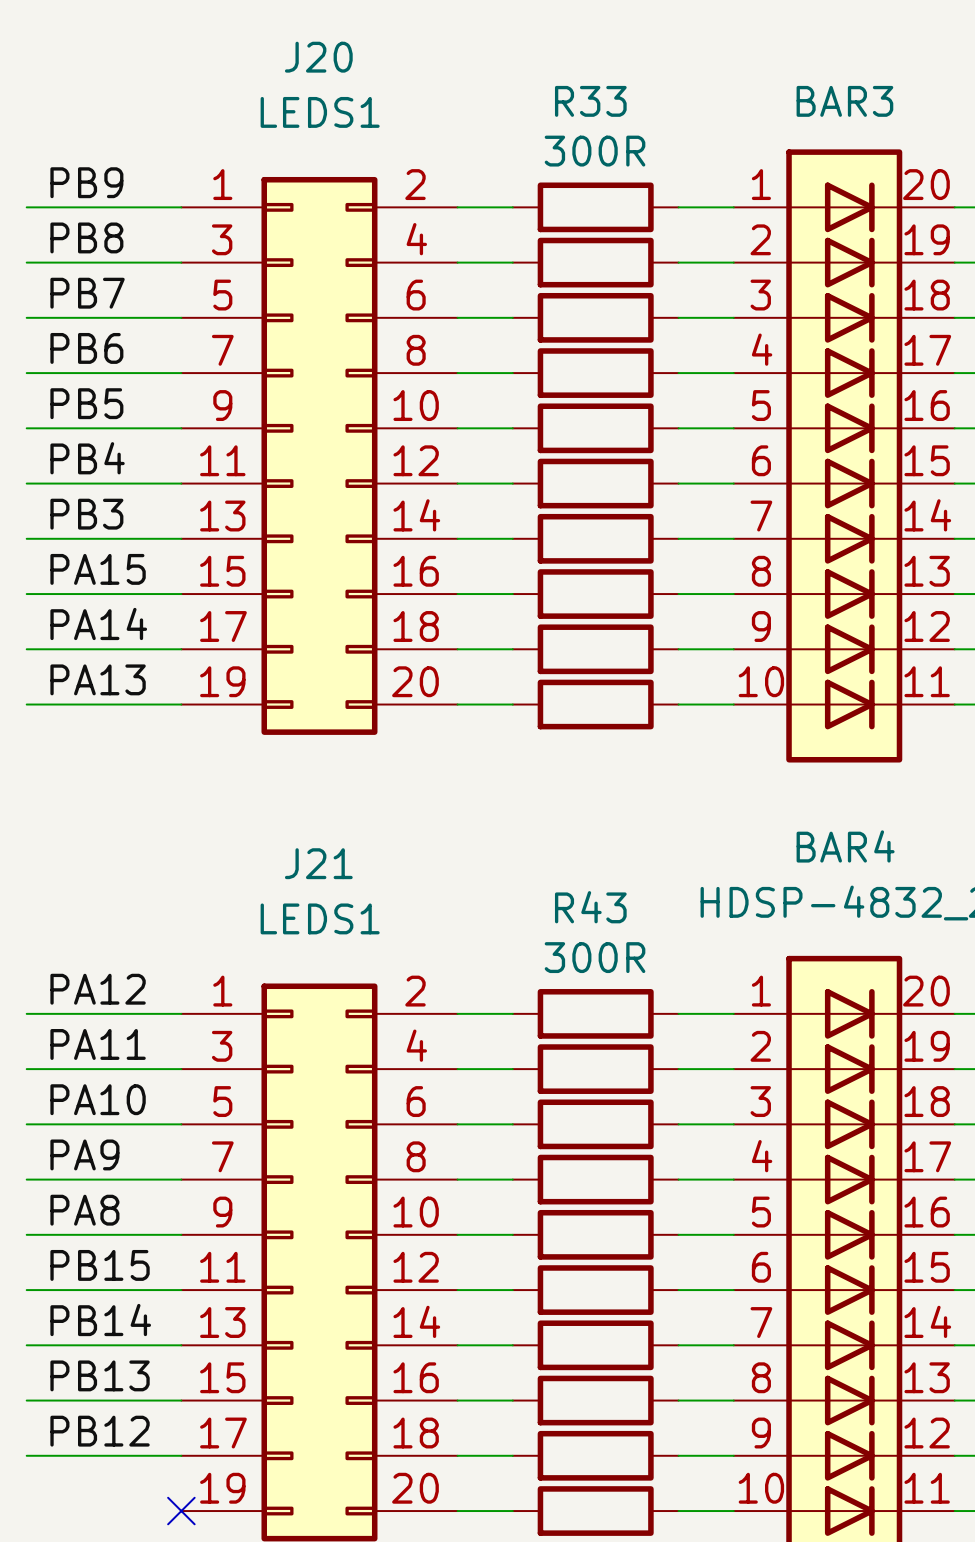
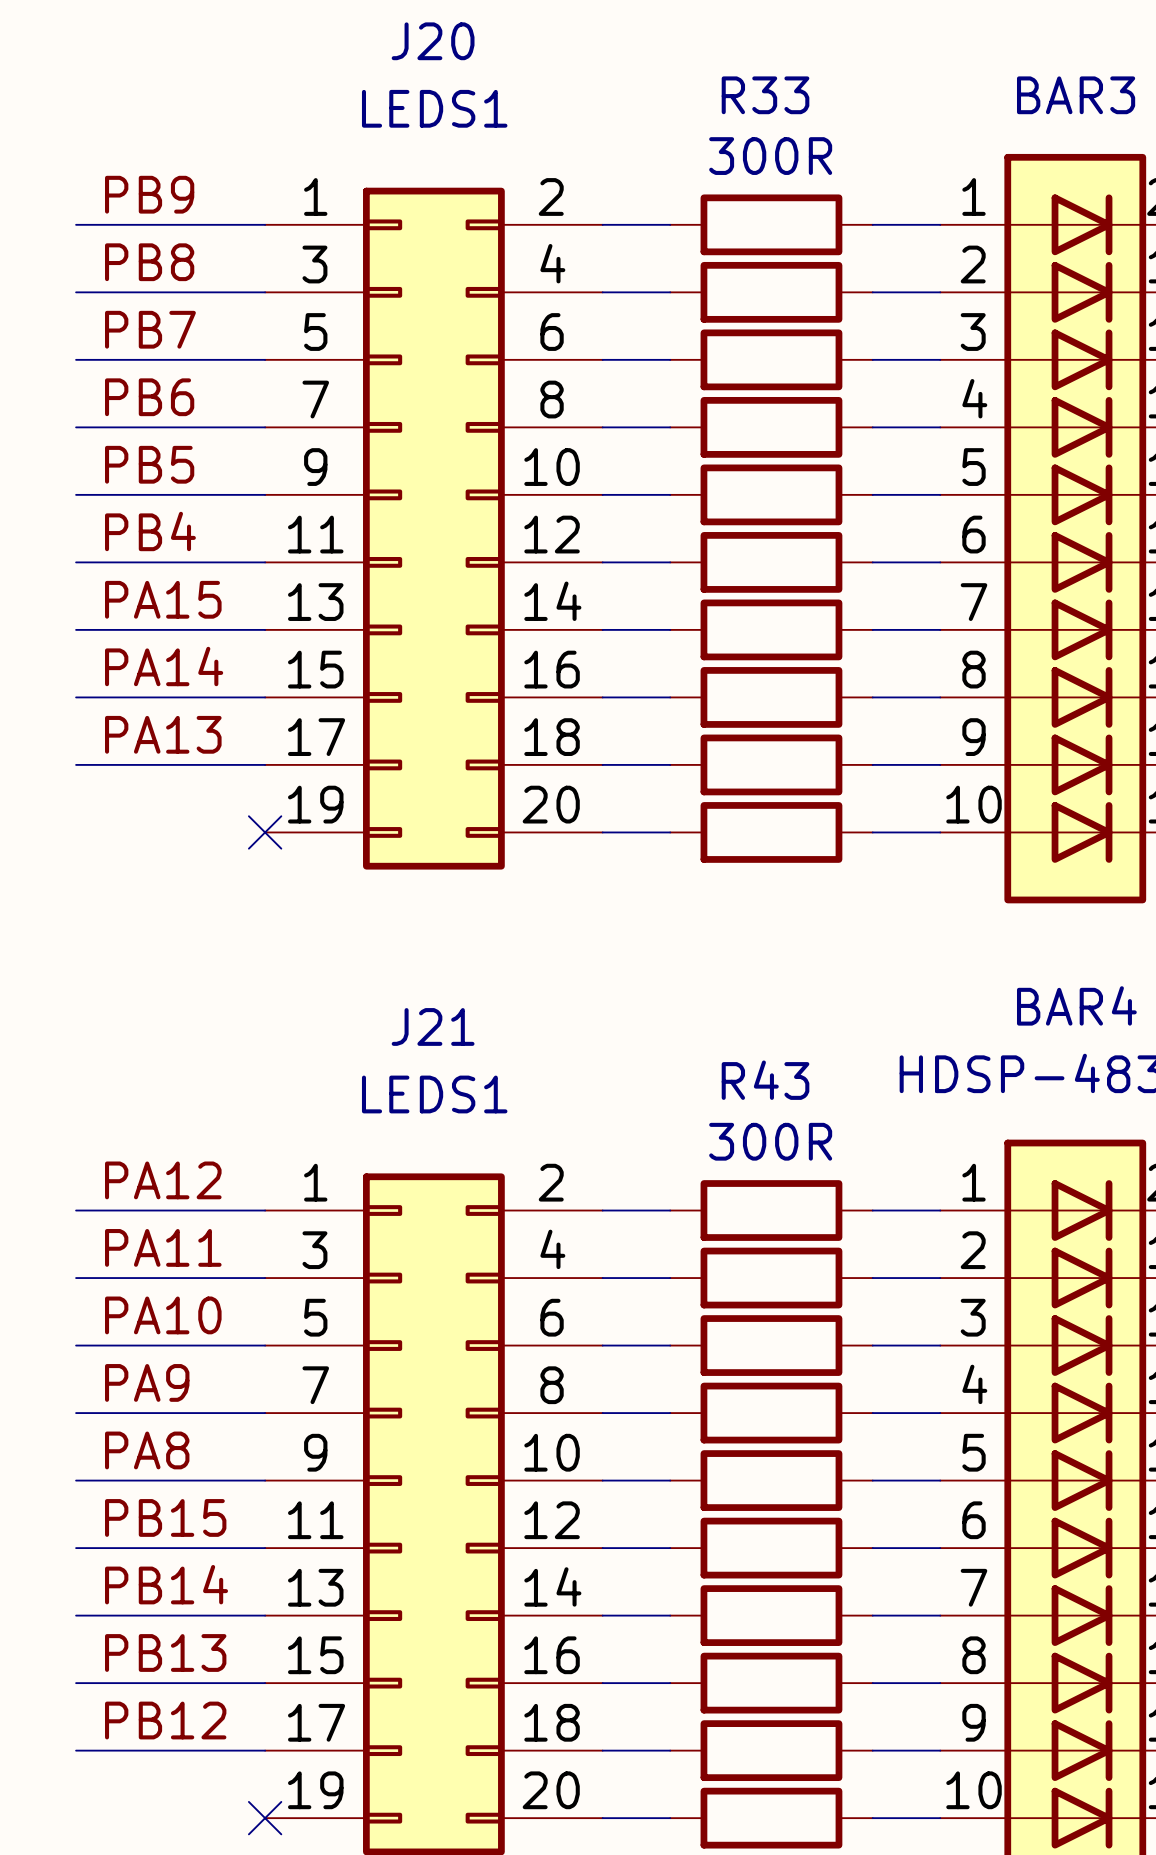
label: PB3 (86, 514) -> PA15 (163, 599)
label: PA15 (98, 569) -> PA14 (164, 666)
label: PA14 (98, 623) -> PA13 (163, 734)
label: PA13 (98, 679) -> none
wire: (26, 704) (181, 704) -> none
no-connect mark: none -> (265, 832)

